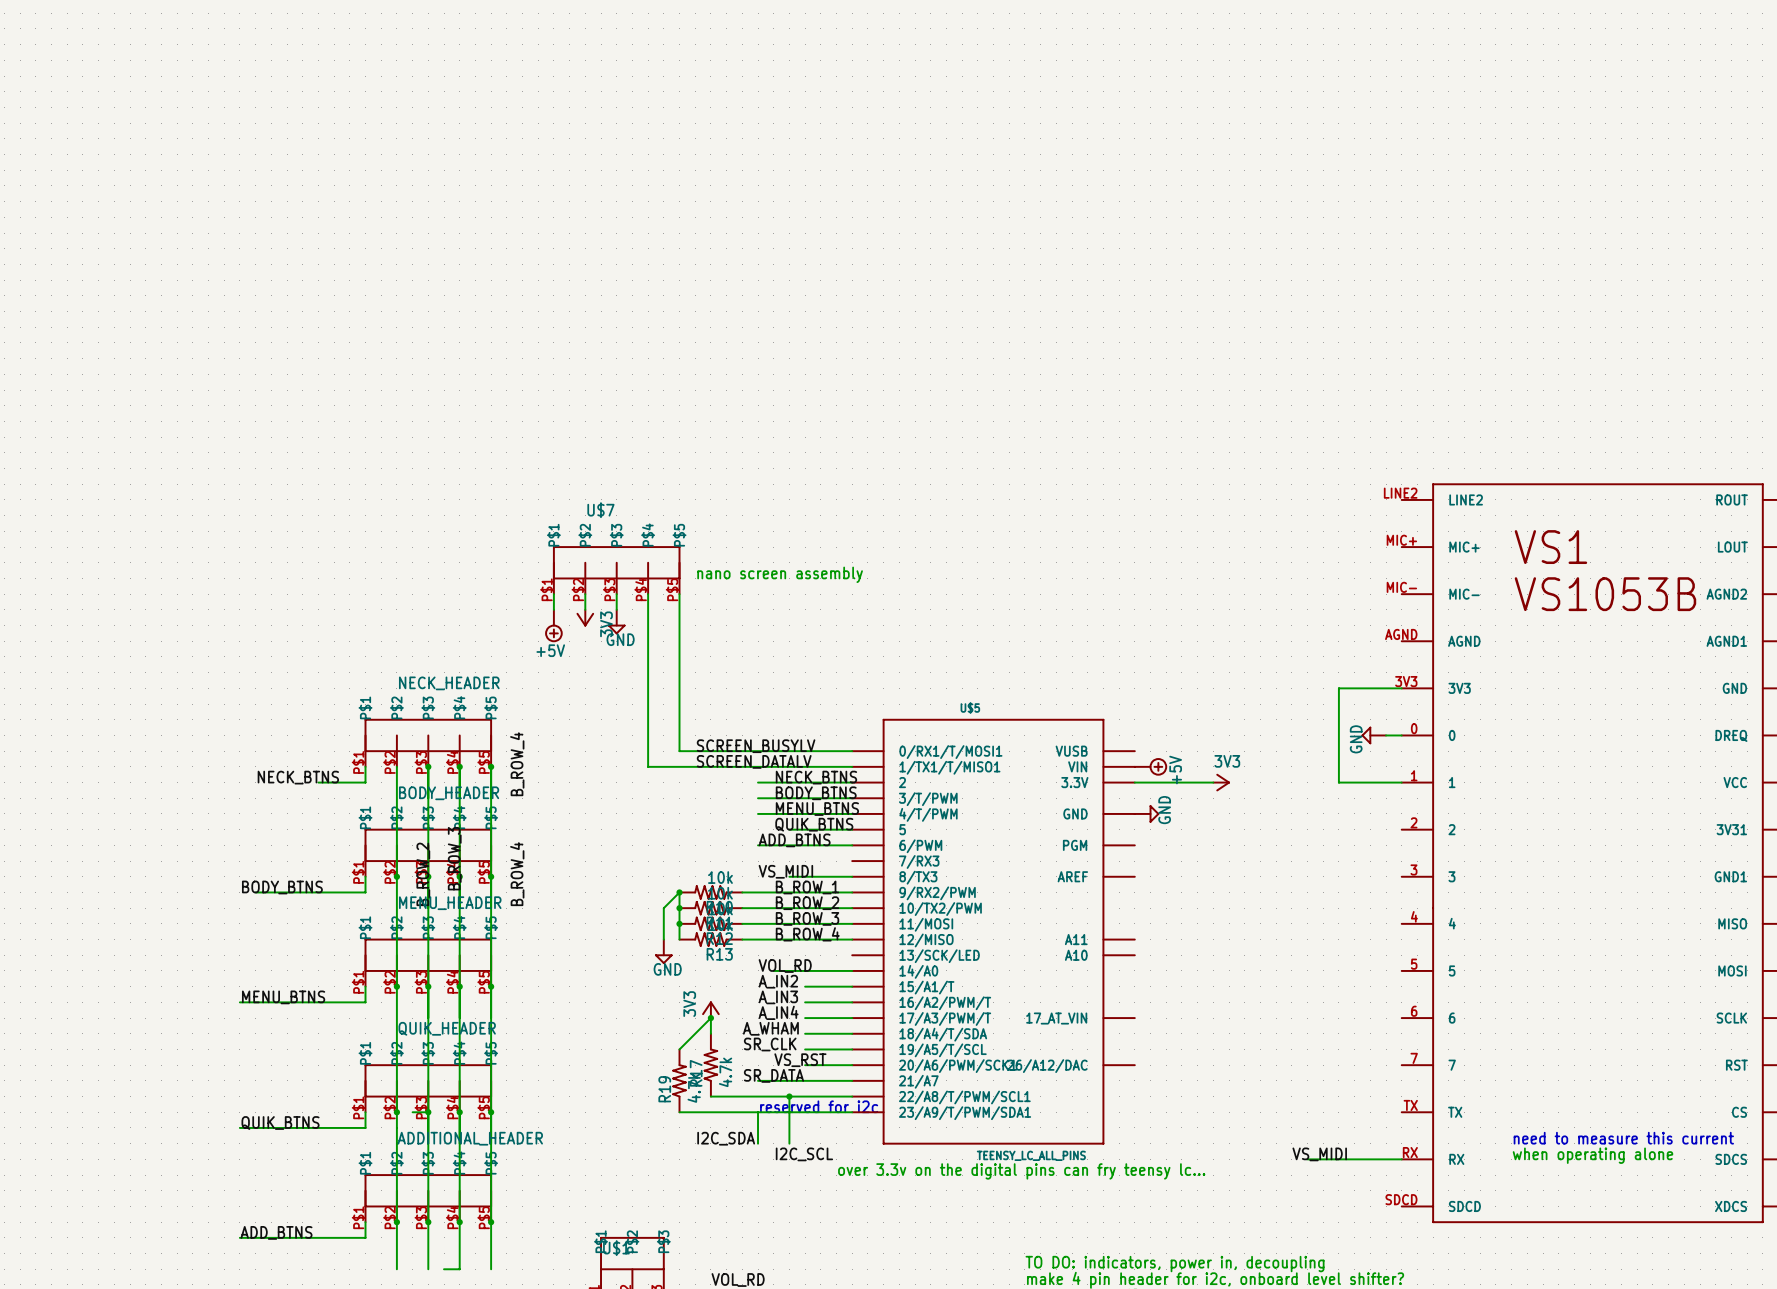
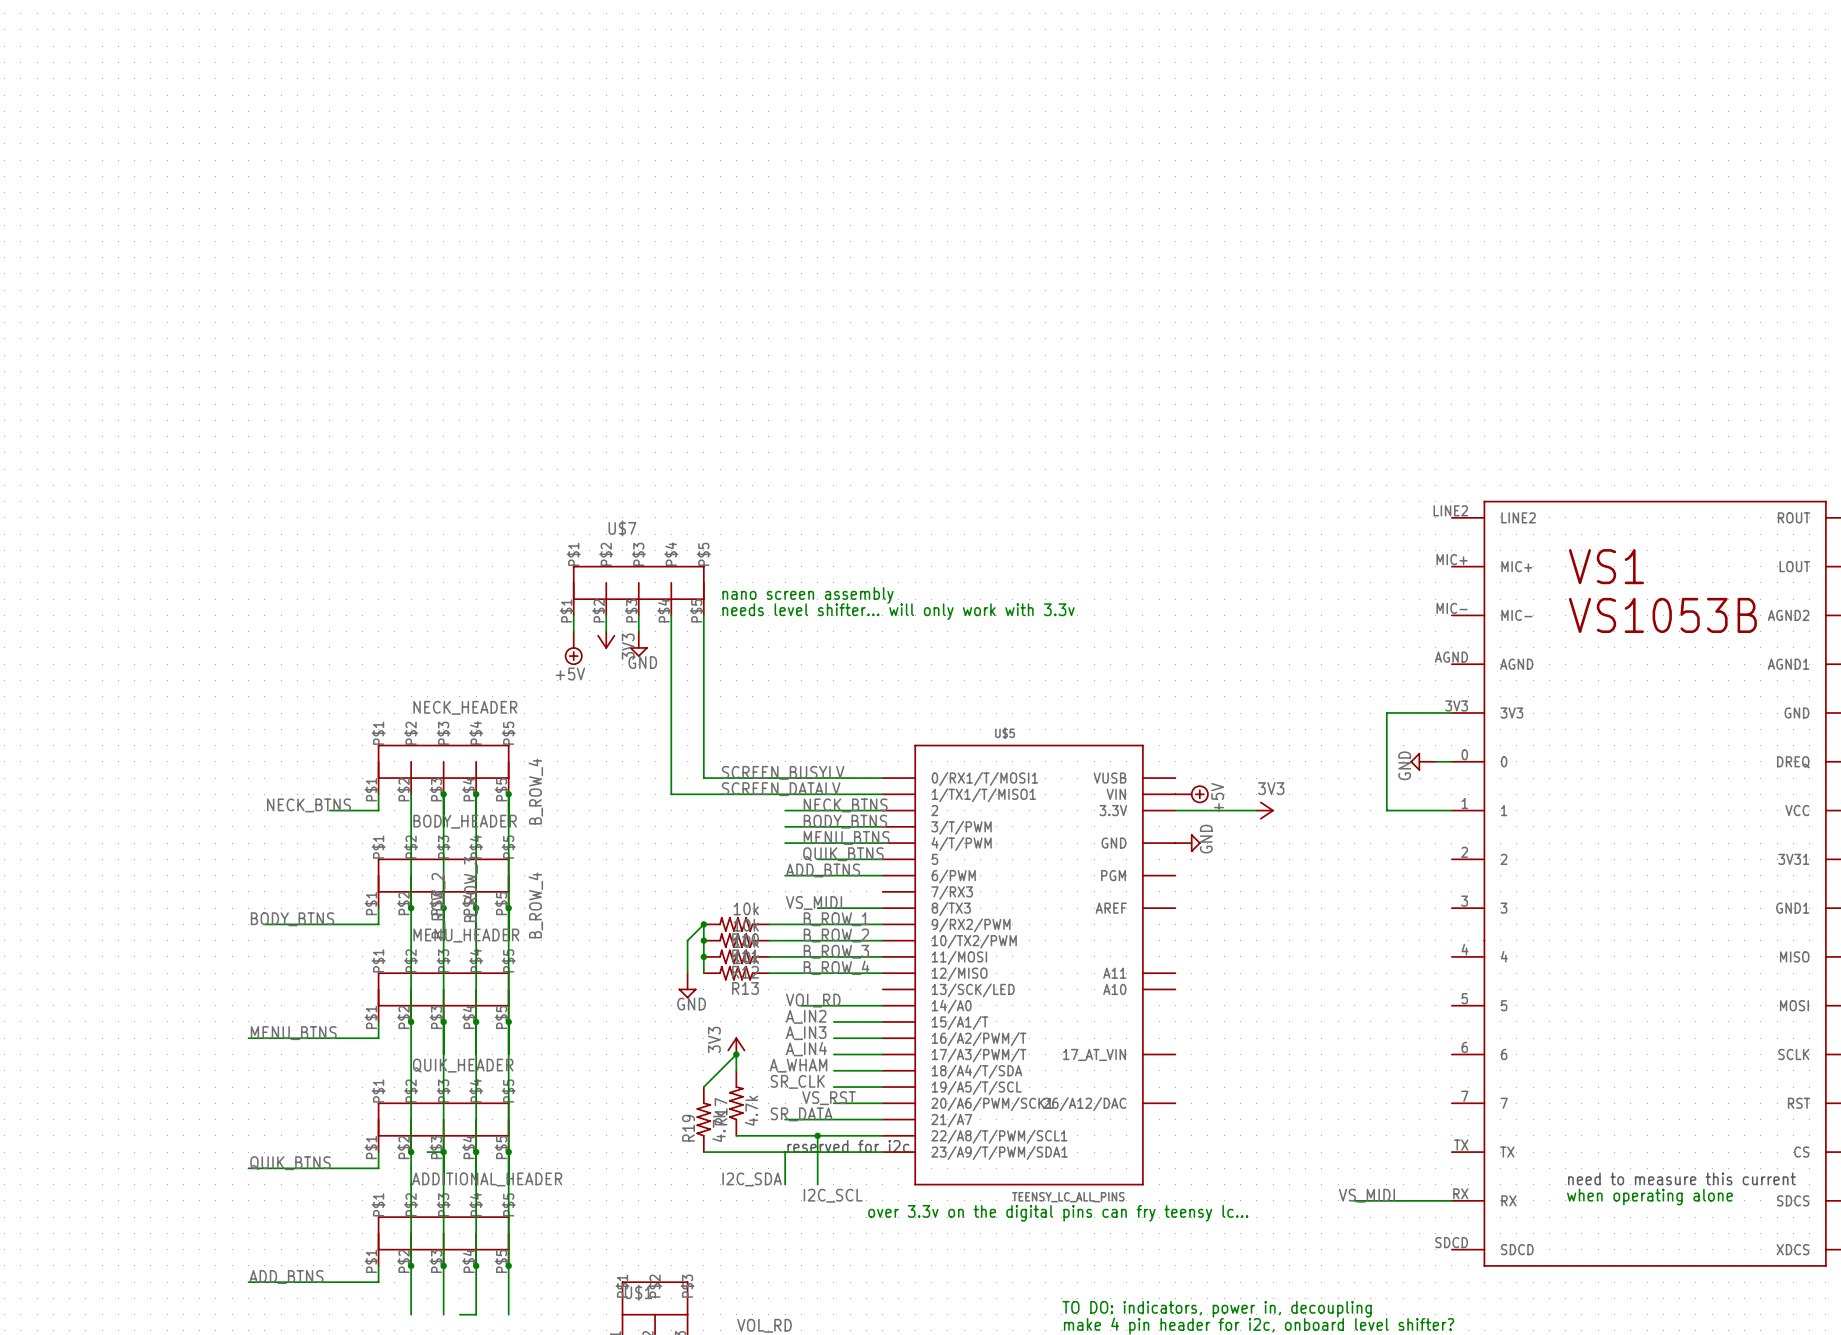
text: none -> needs level shifter... will only work with 3.3v (898, 611)

